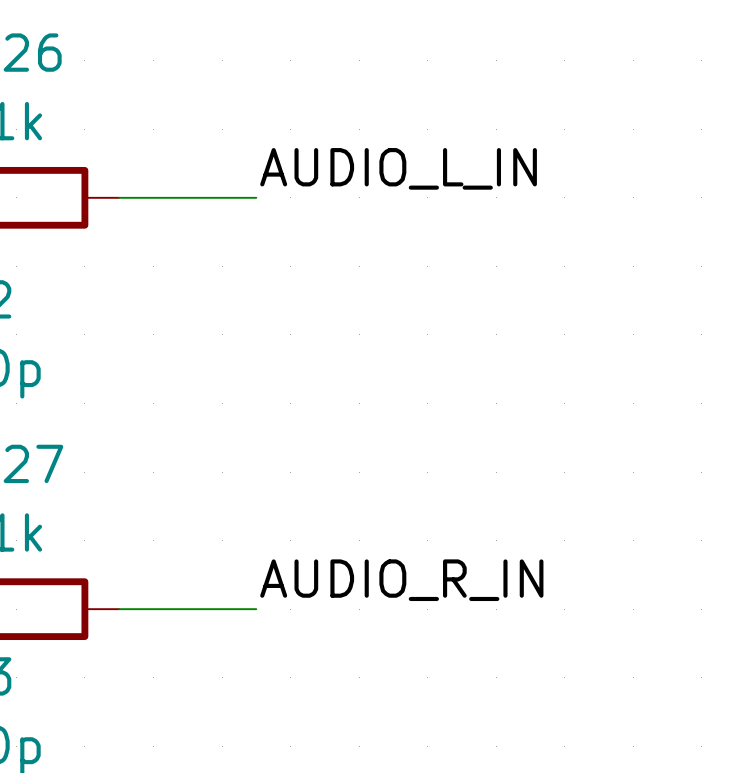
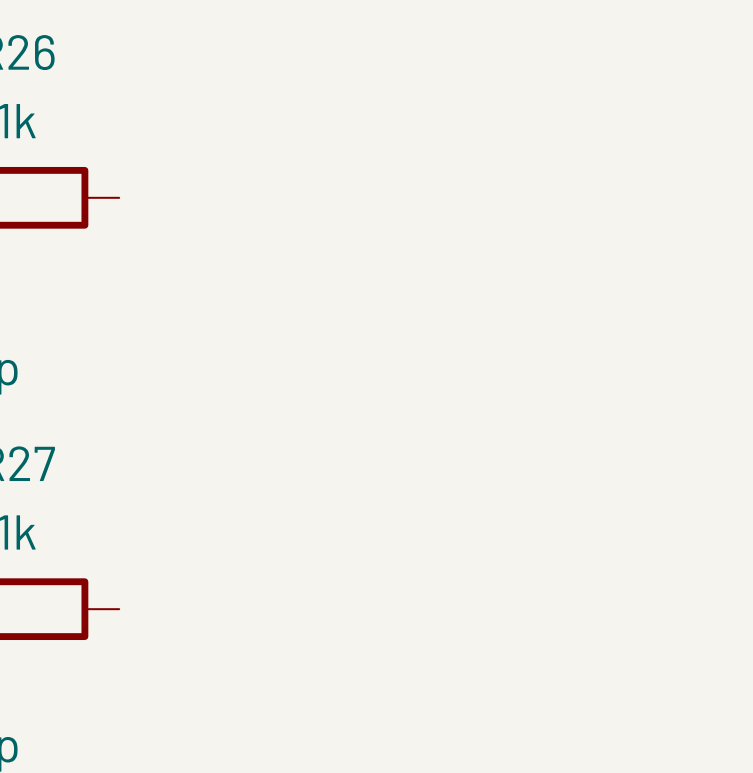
label: AUDIO_L_IN (398, 168) -> none
wire: (119, 197) (256, 197) -> none
label: AUDIO_R_IN (401, 580) -> none
wire: (119, 609) (256, 609) -> none

